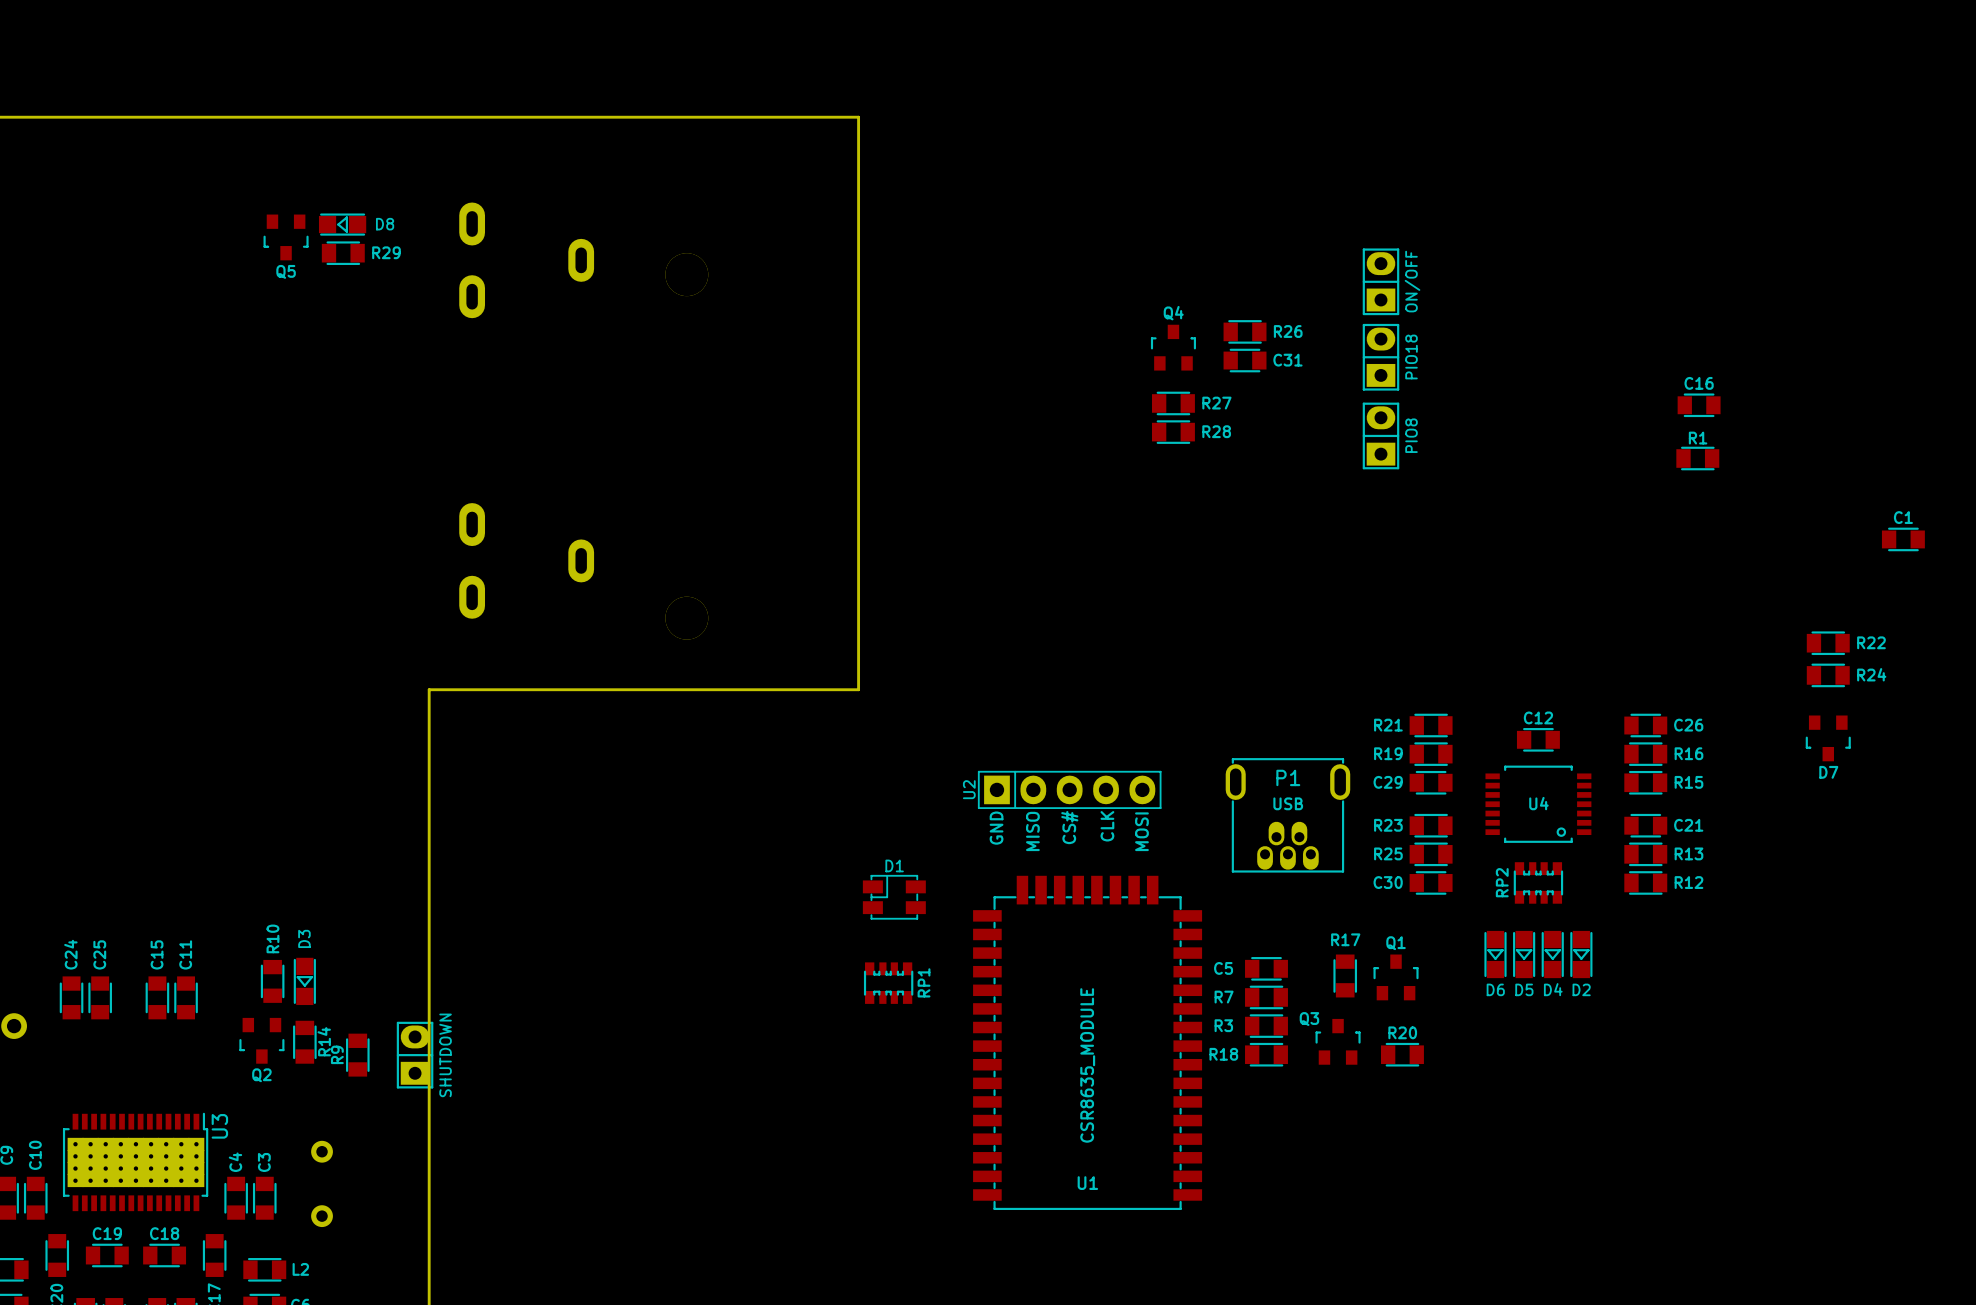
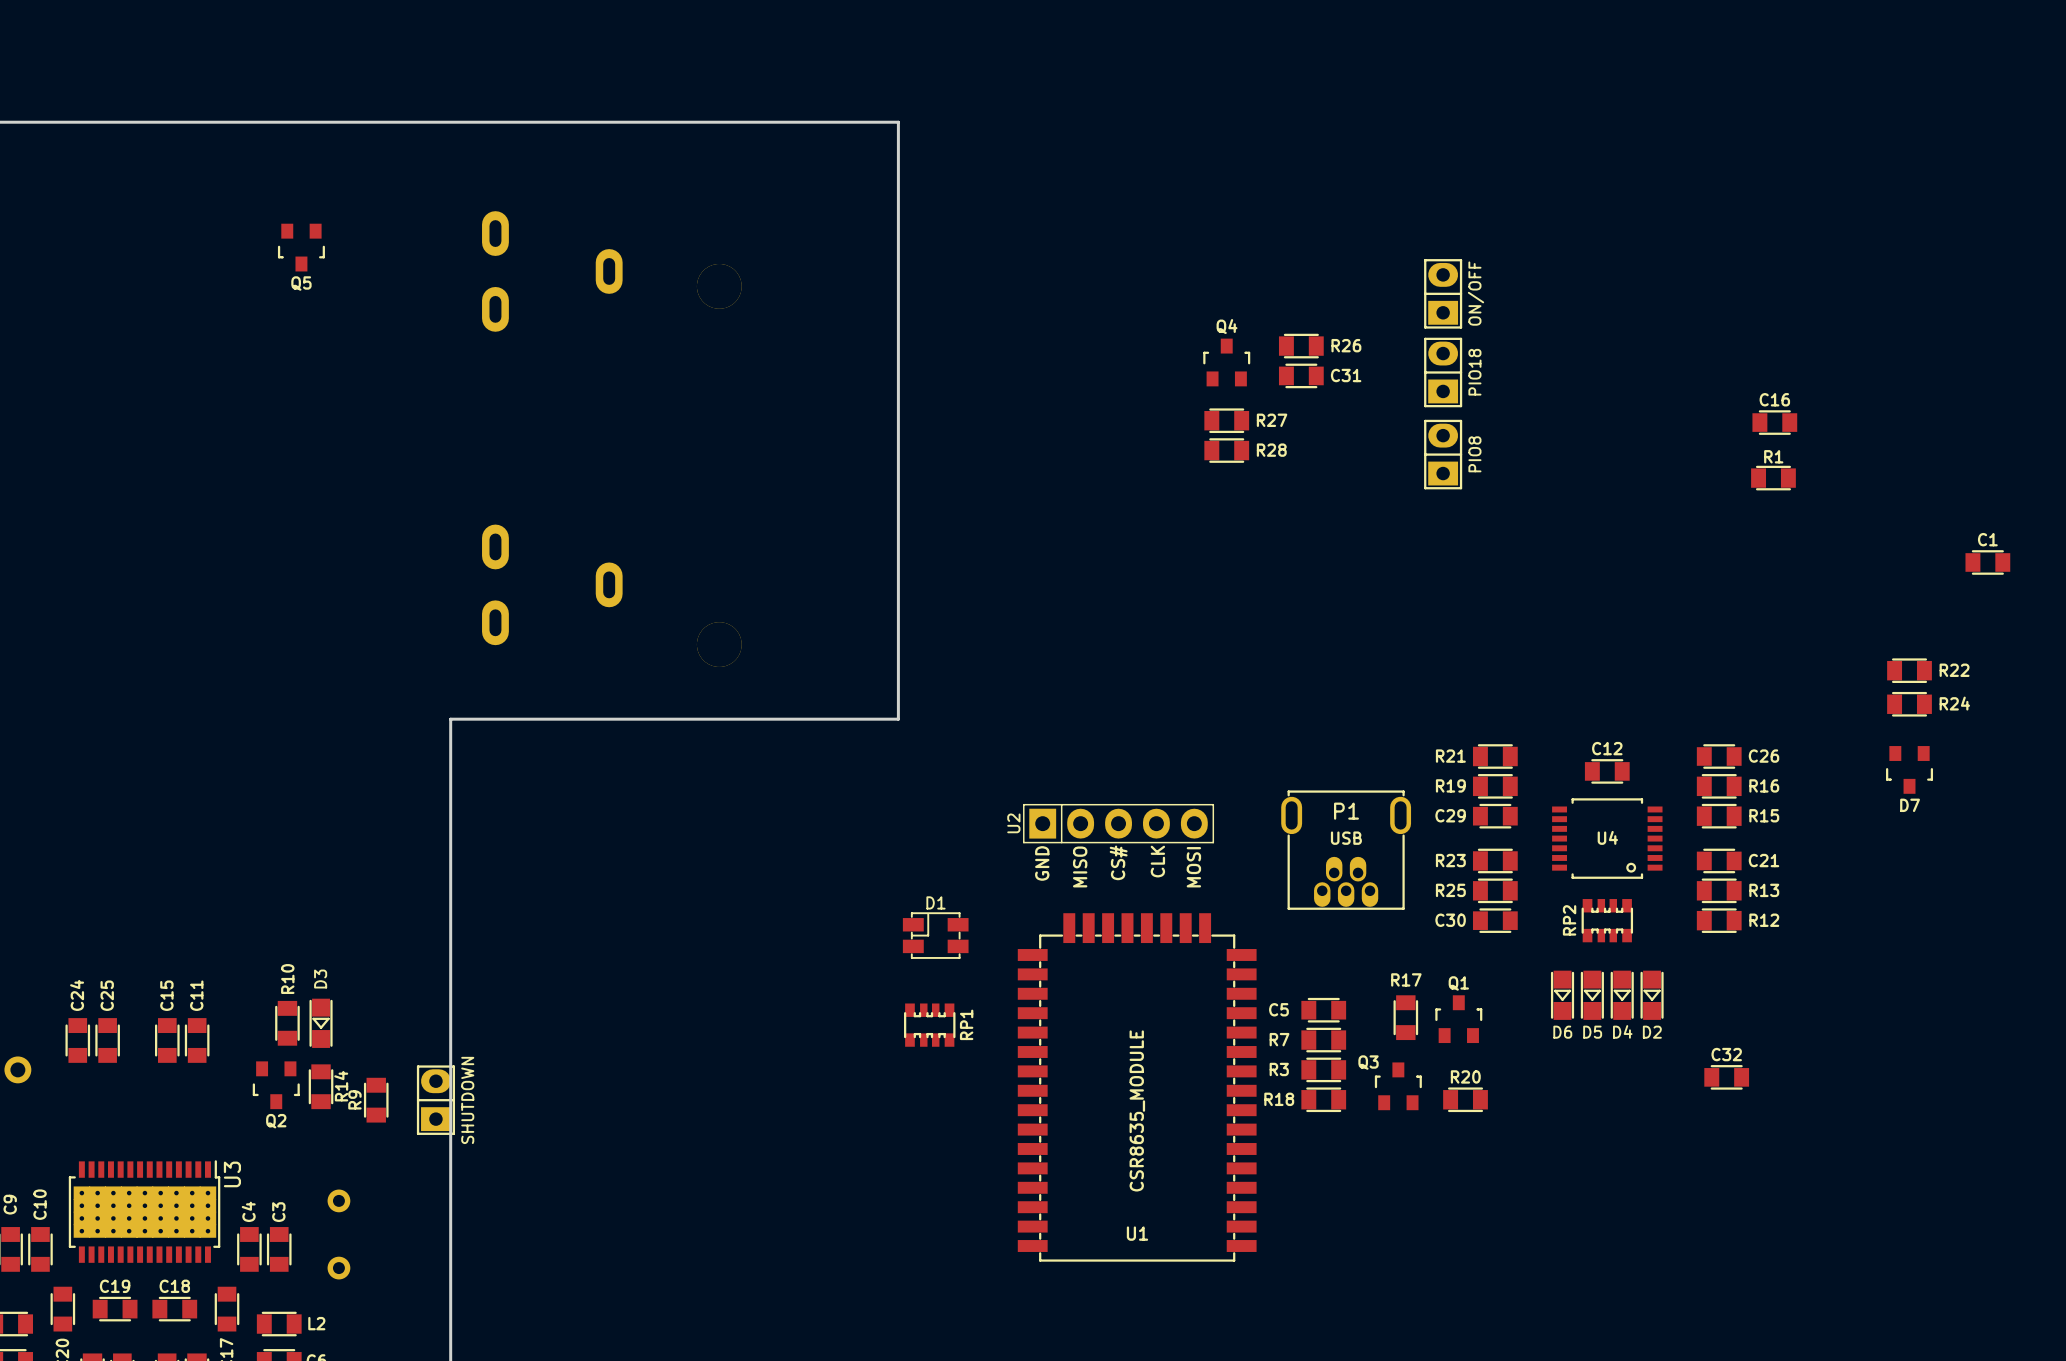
D8: (342, 224) -> none
R29: (343, 253) -> none
C32: none -> (1726, 1077)

